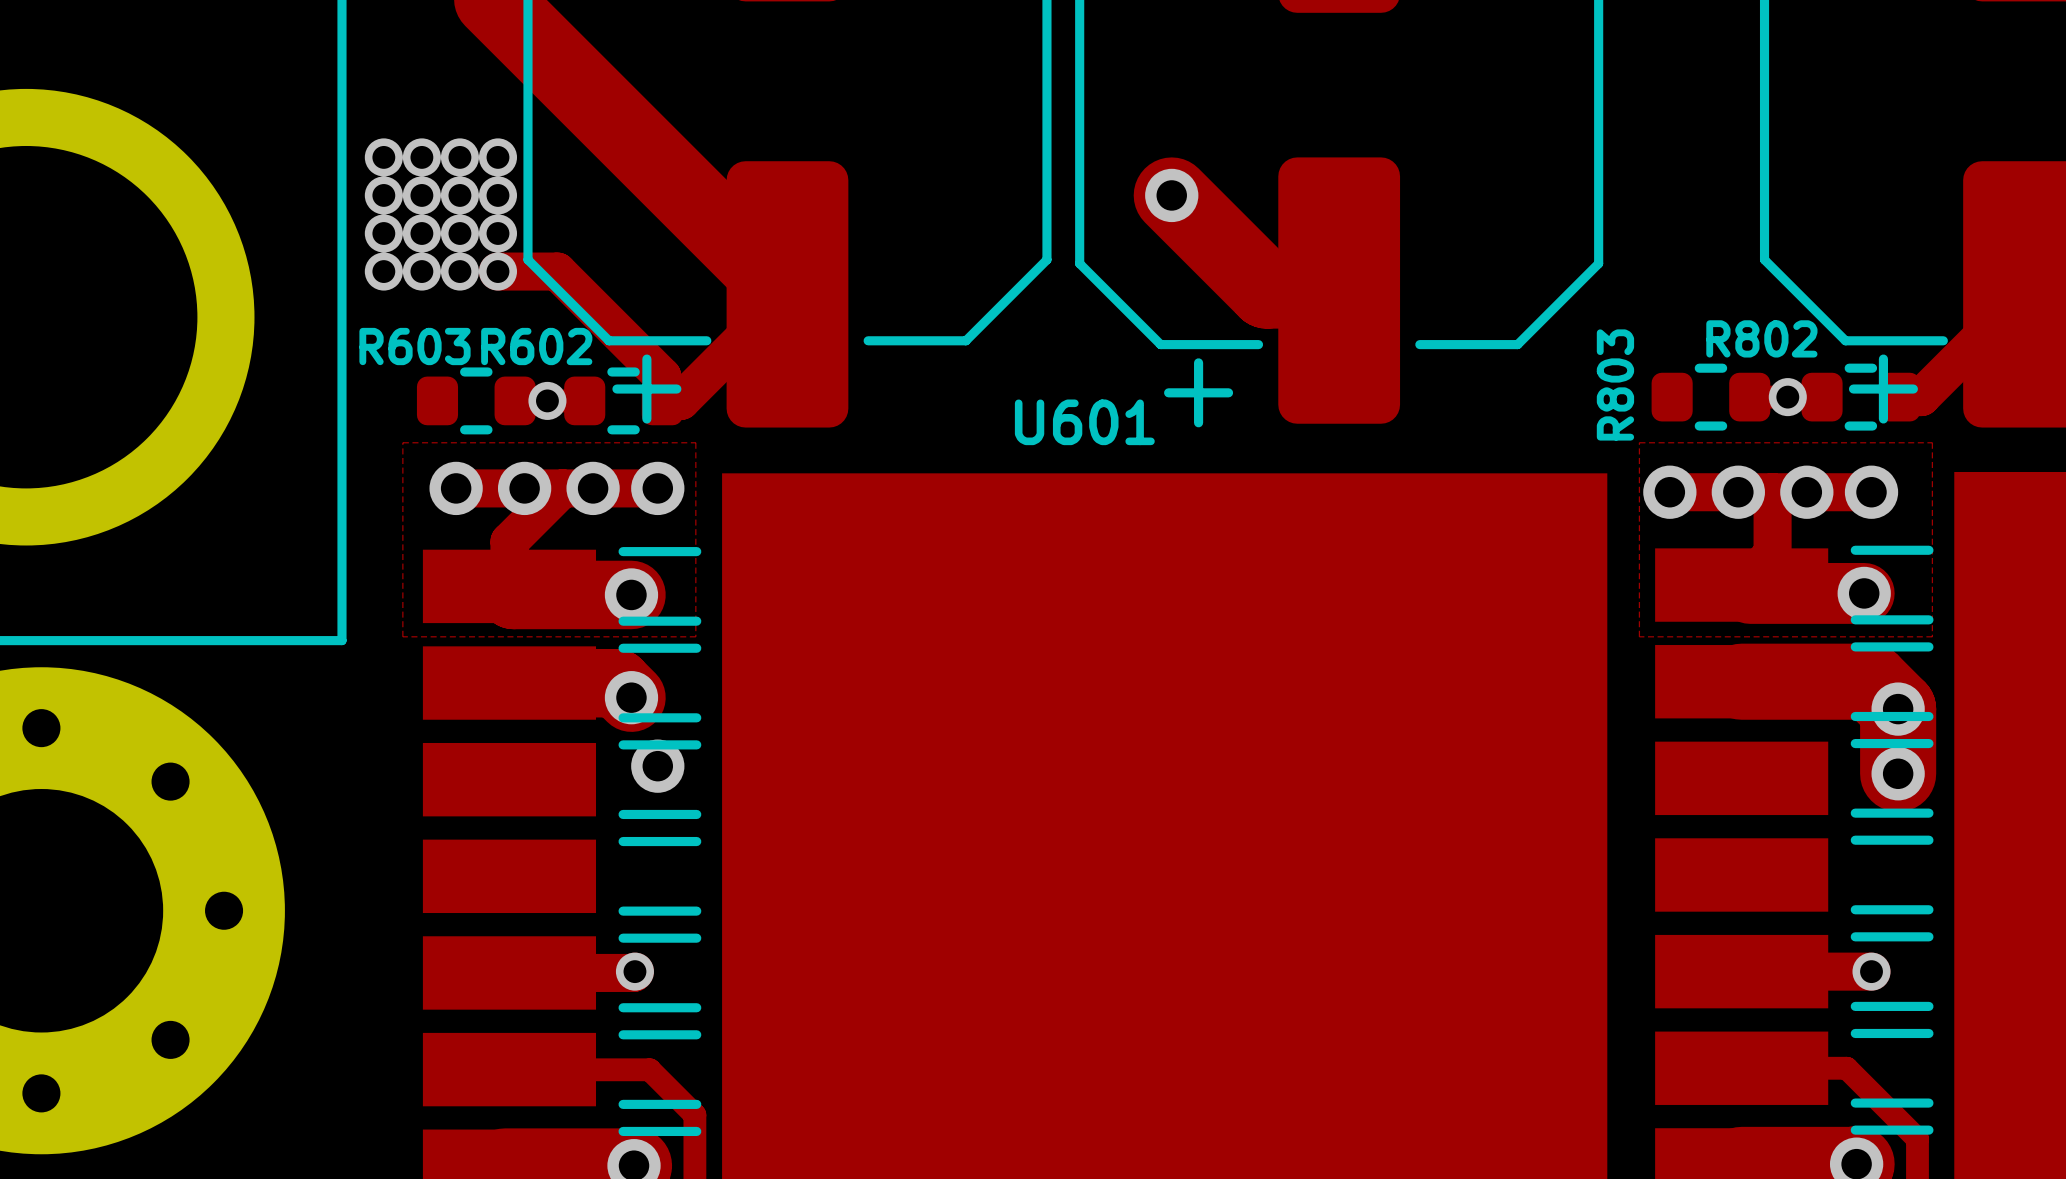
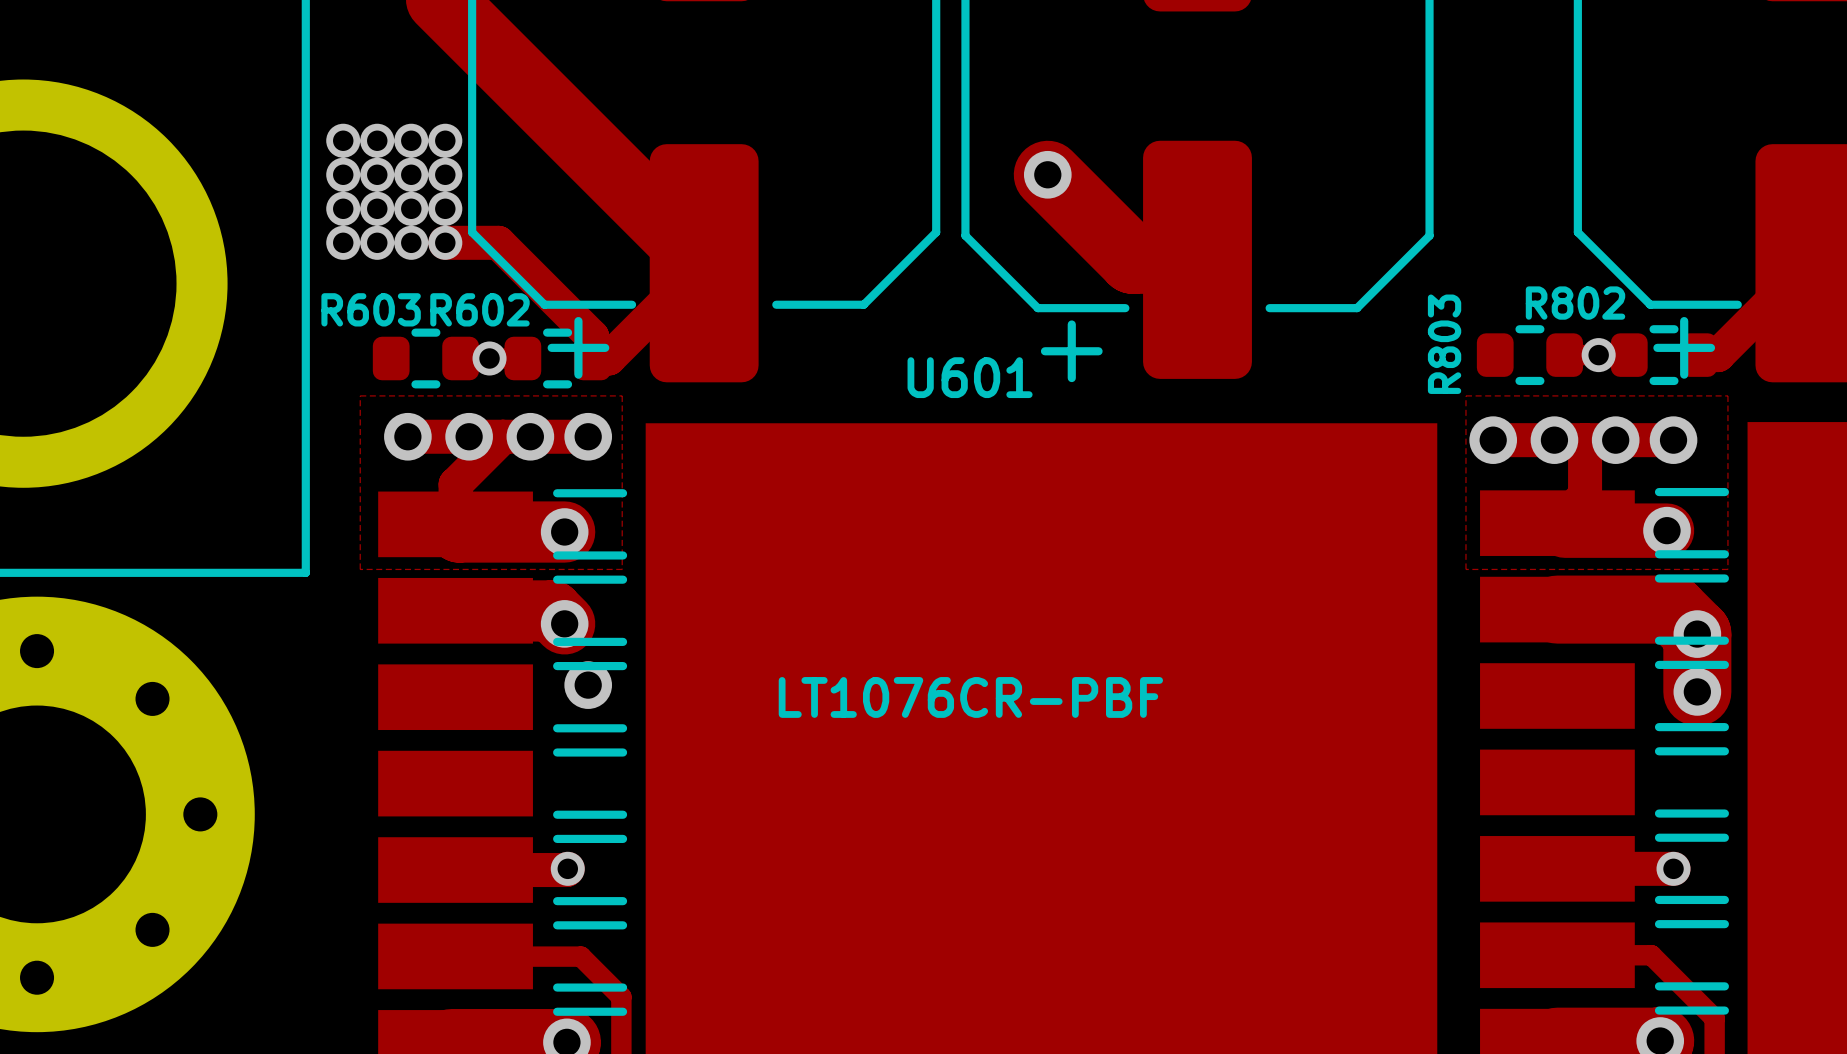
U601 value: none -> LT1076CR-PBF (970, 697)

